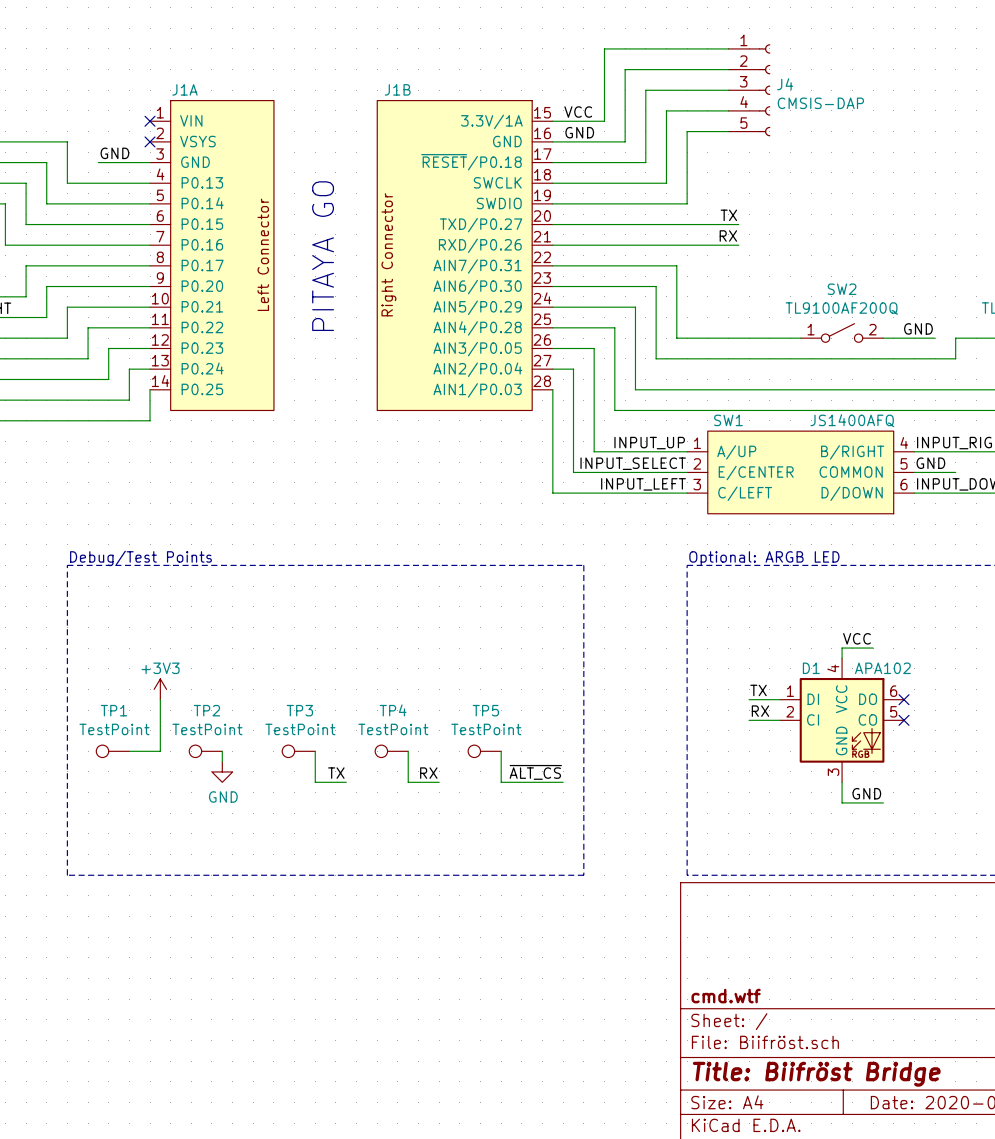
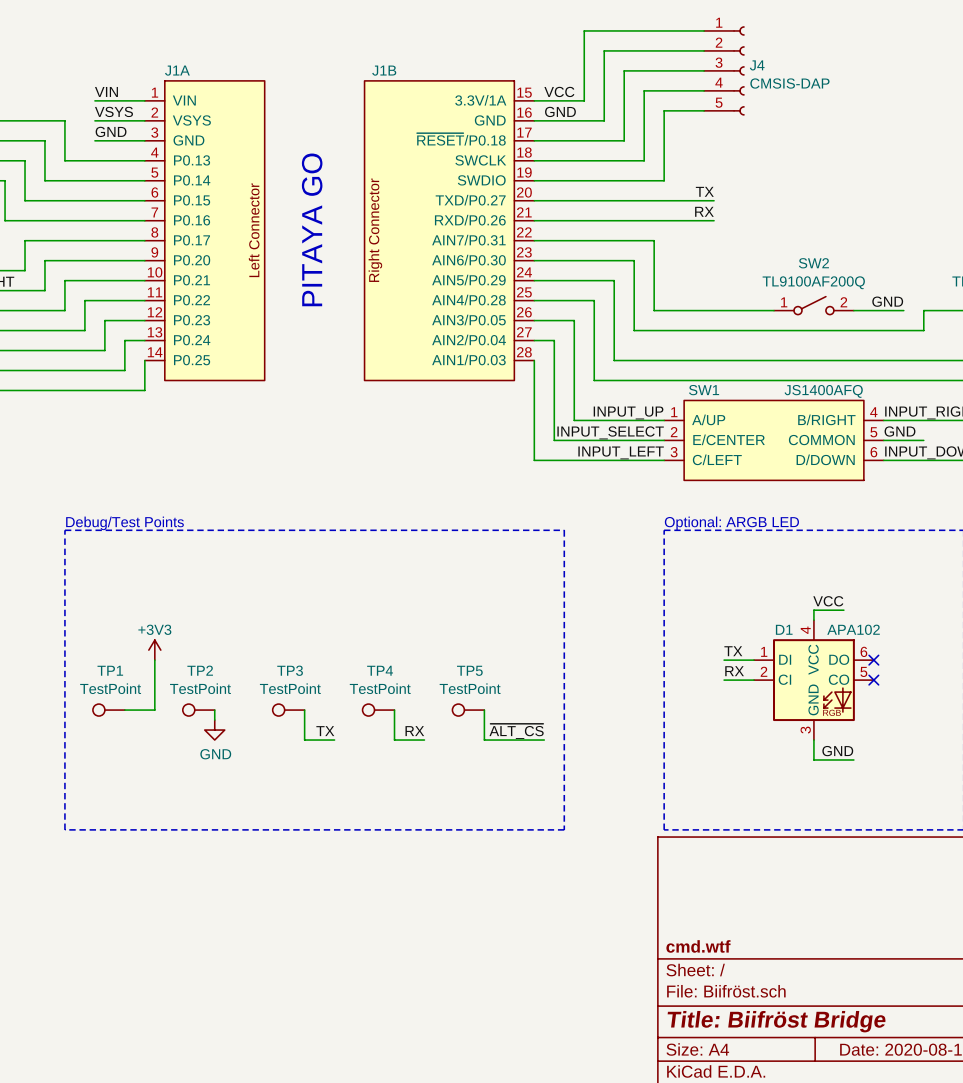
label: none -> VIN (106, 91)
wire: none -> (94, 100) (144, 100)
no-connect mark: (150, 121) -> none
label: none -> VSYS (113, 111)
wire: none -> (94, 120) (144, 120)
no-connect mark: (150, 141) -> none

